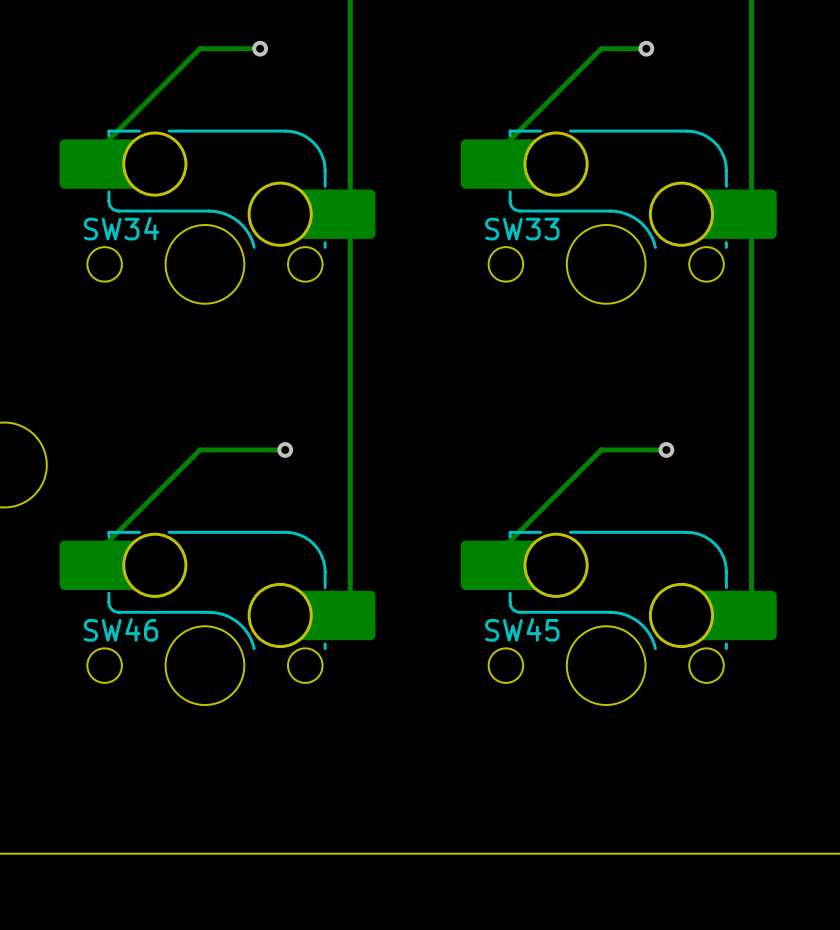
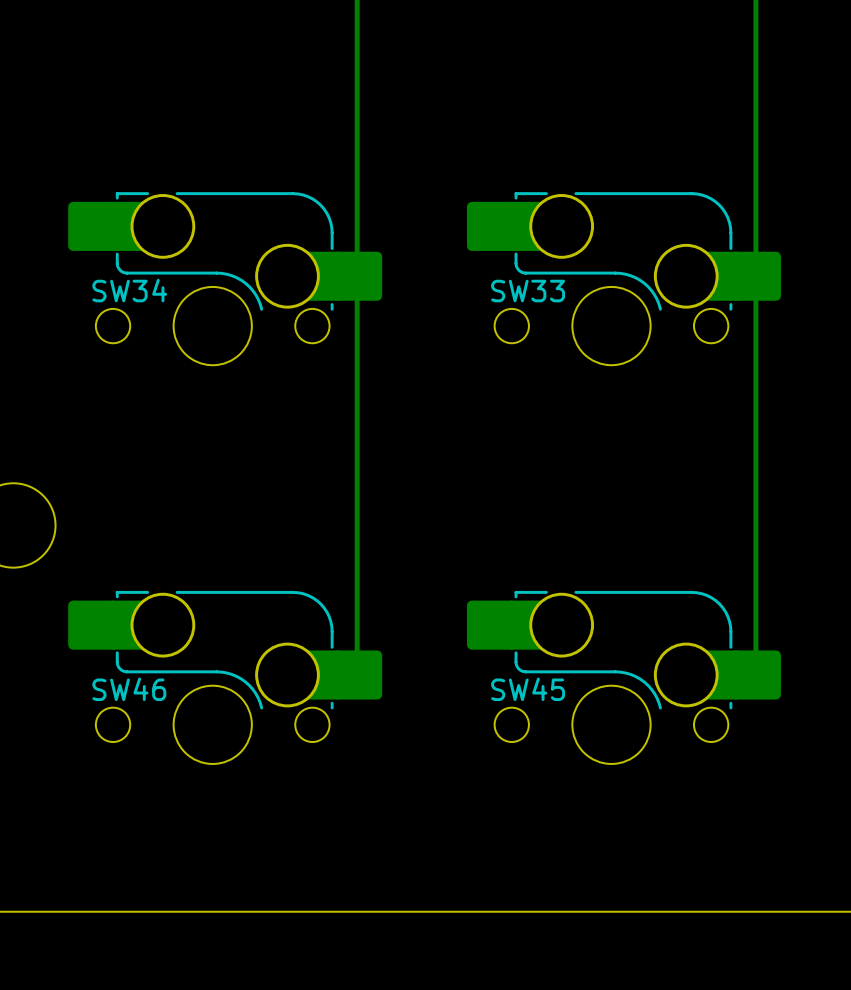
track: (260, 48) (200, 48) (84, 164) -> none
via: (260, 48) -> none
track: (646, 48) (601, 48) (485, 164) -> none
via: (646, 48) -> none
track: (285, 449) (200, 449) (84, 565) -> none
via: (285, 449) -> none
track: (666, 449) (601, 449) (485, 565) -> none
via: (666, 449) -> none

